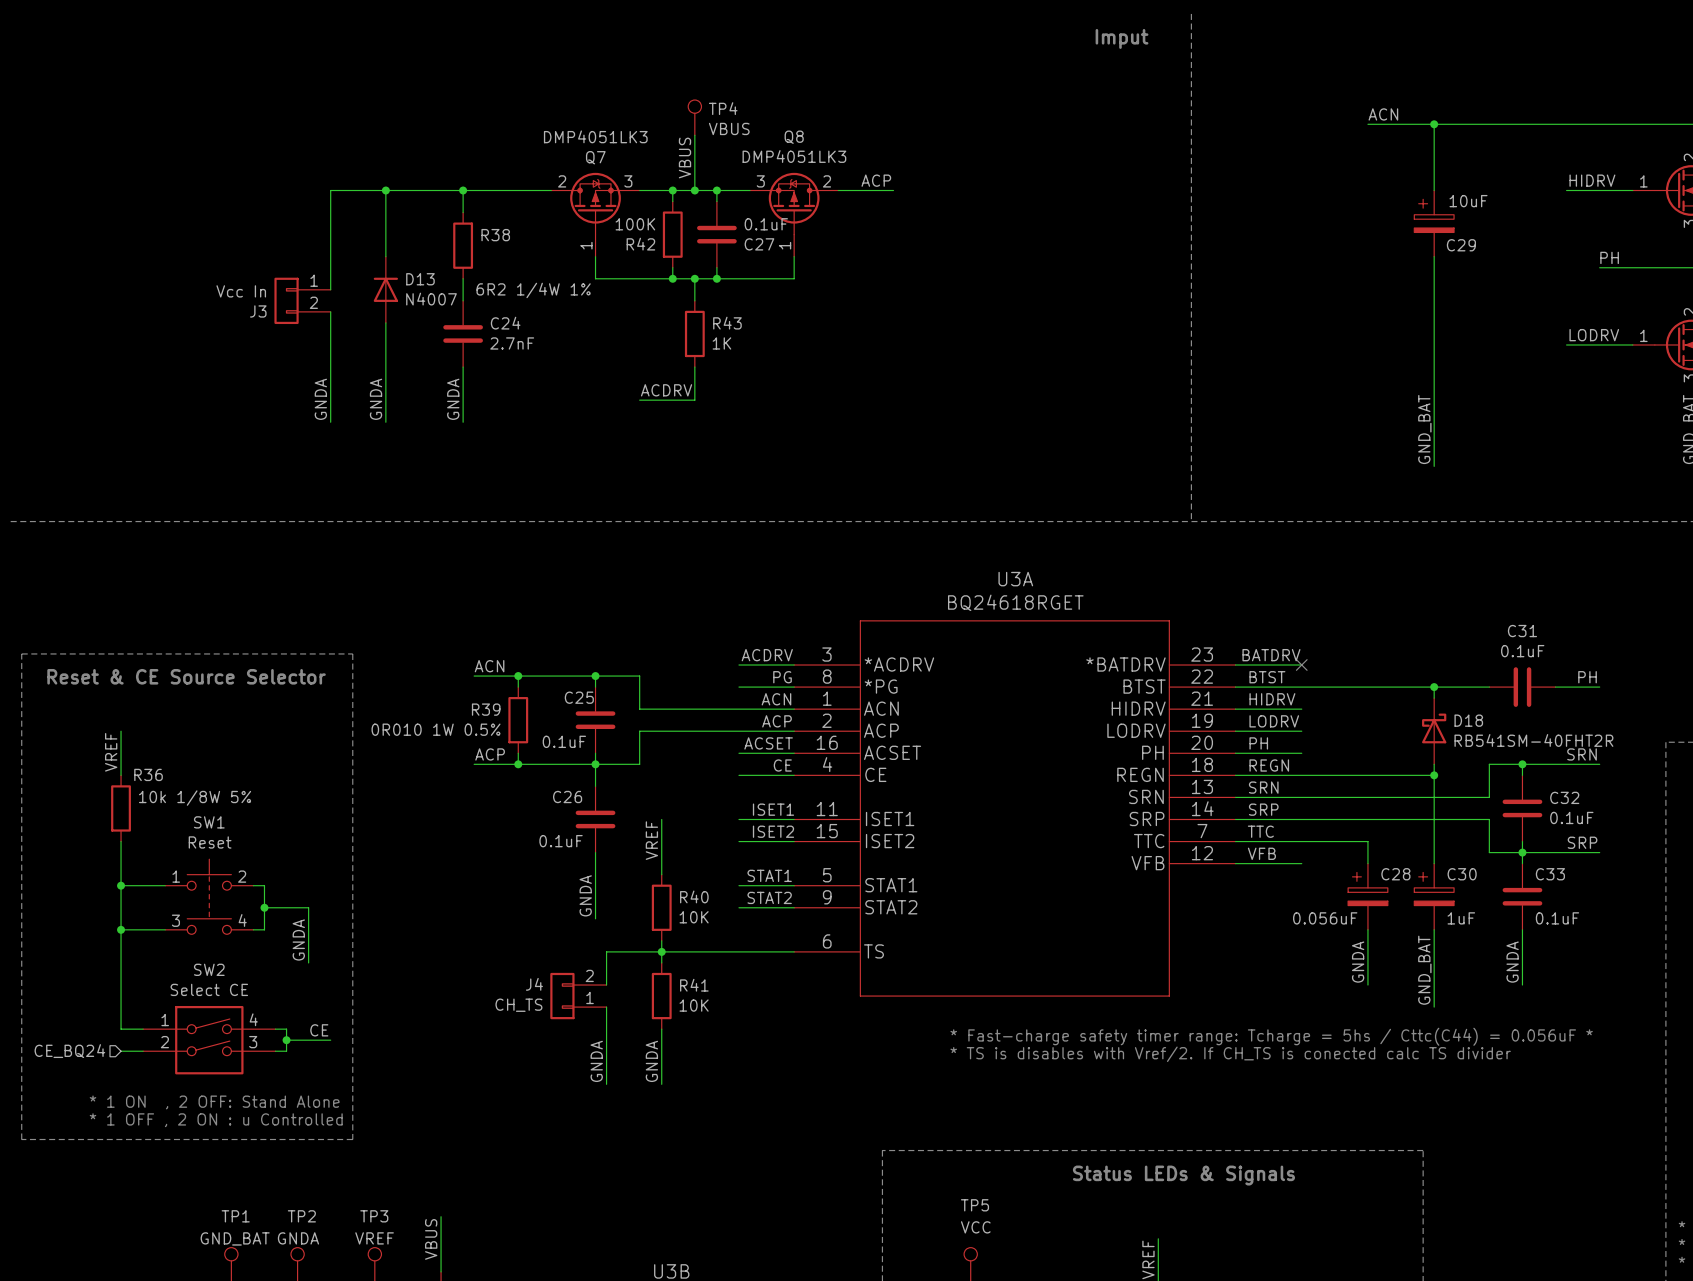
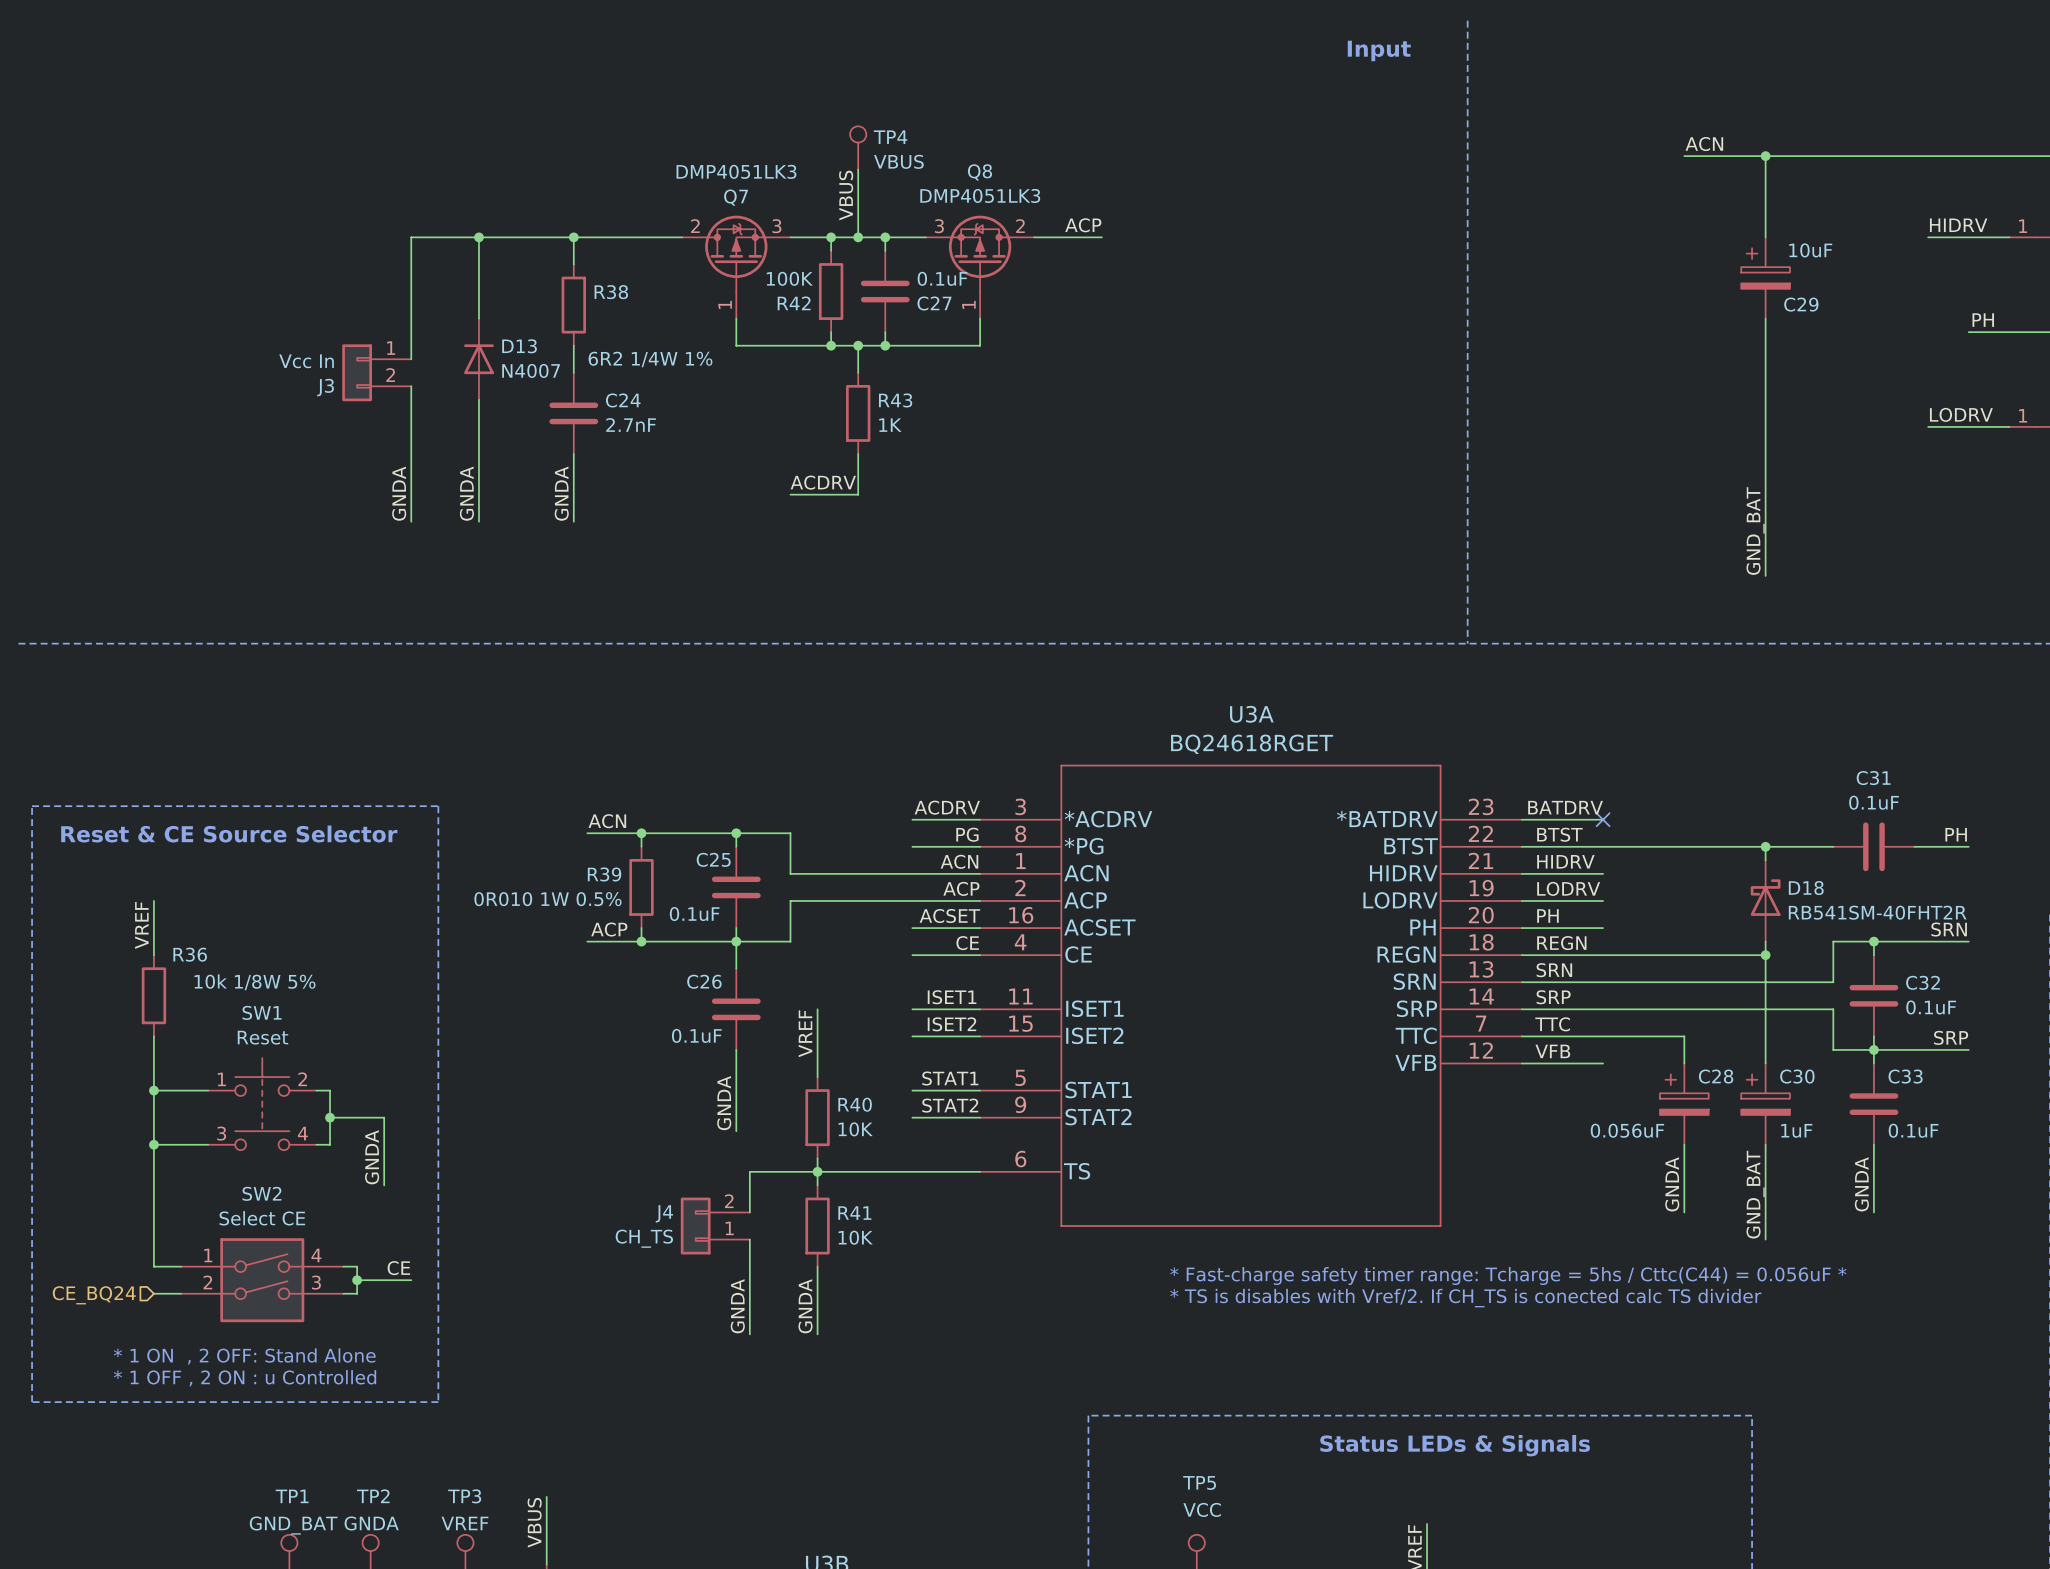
text: Imput (1122, 38) -> Input (1379, 50)

